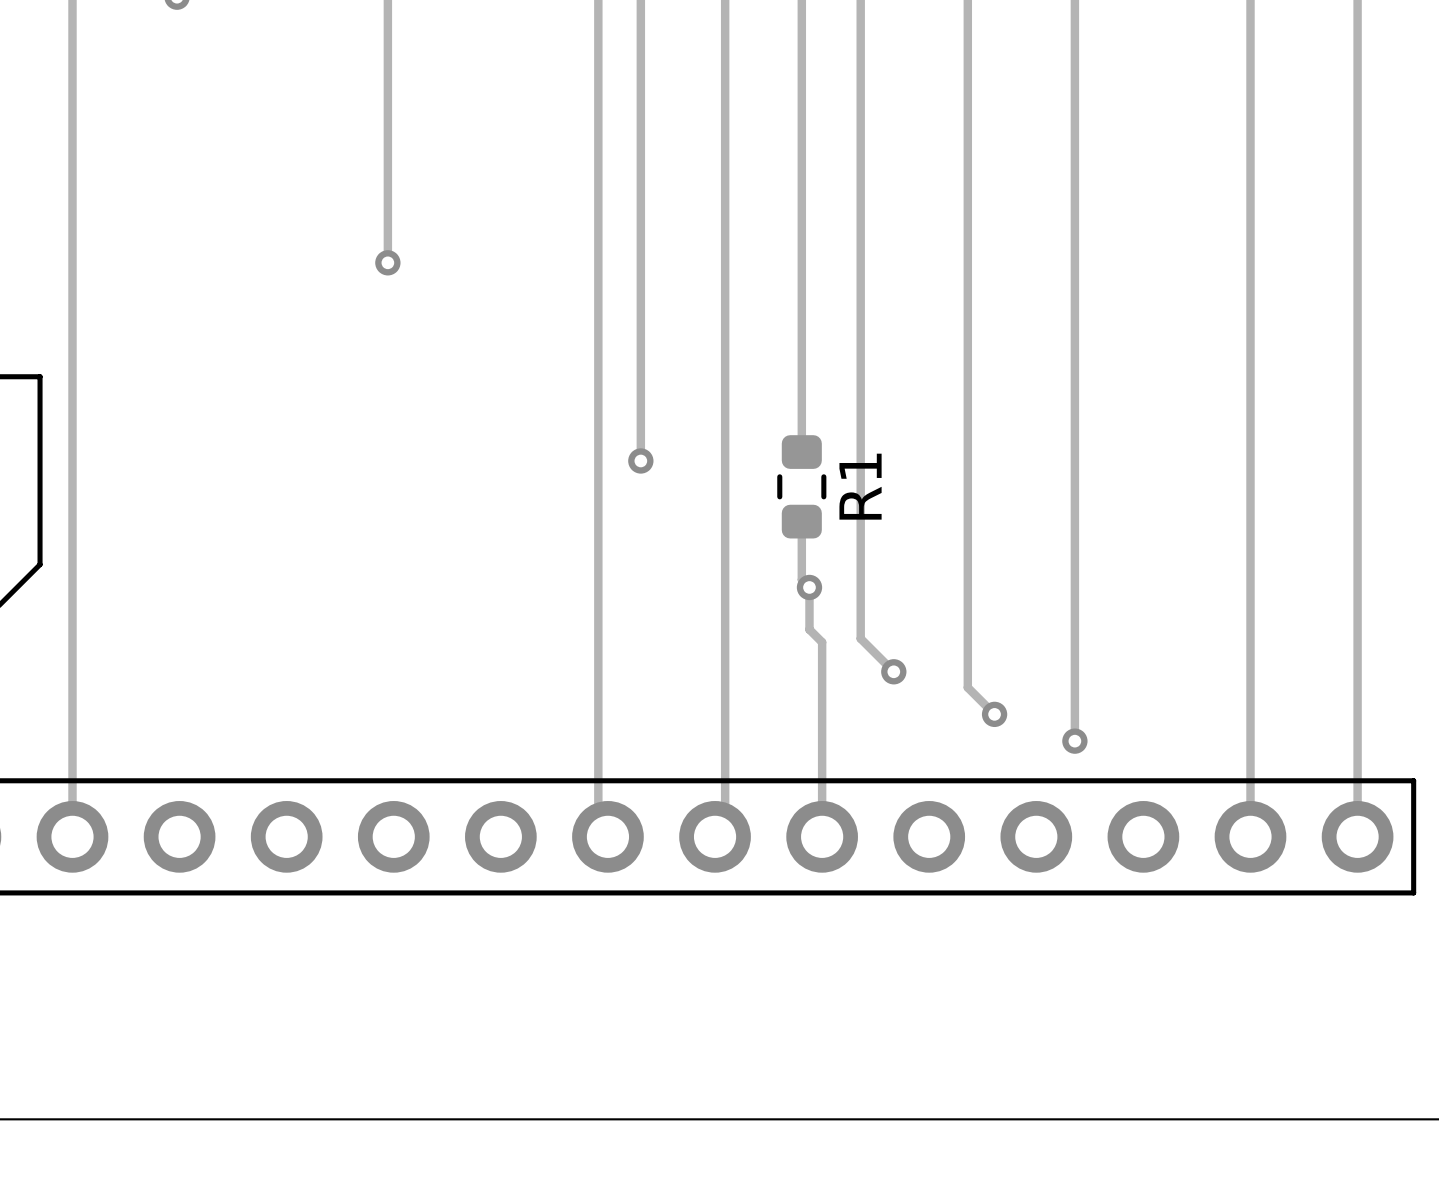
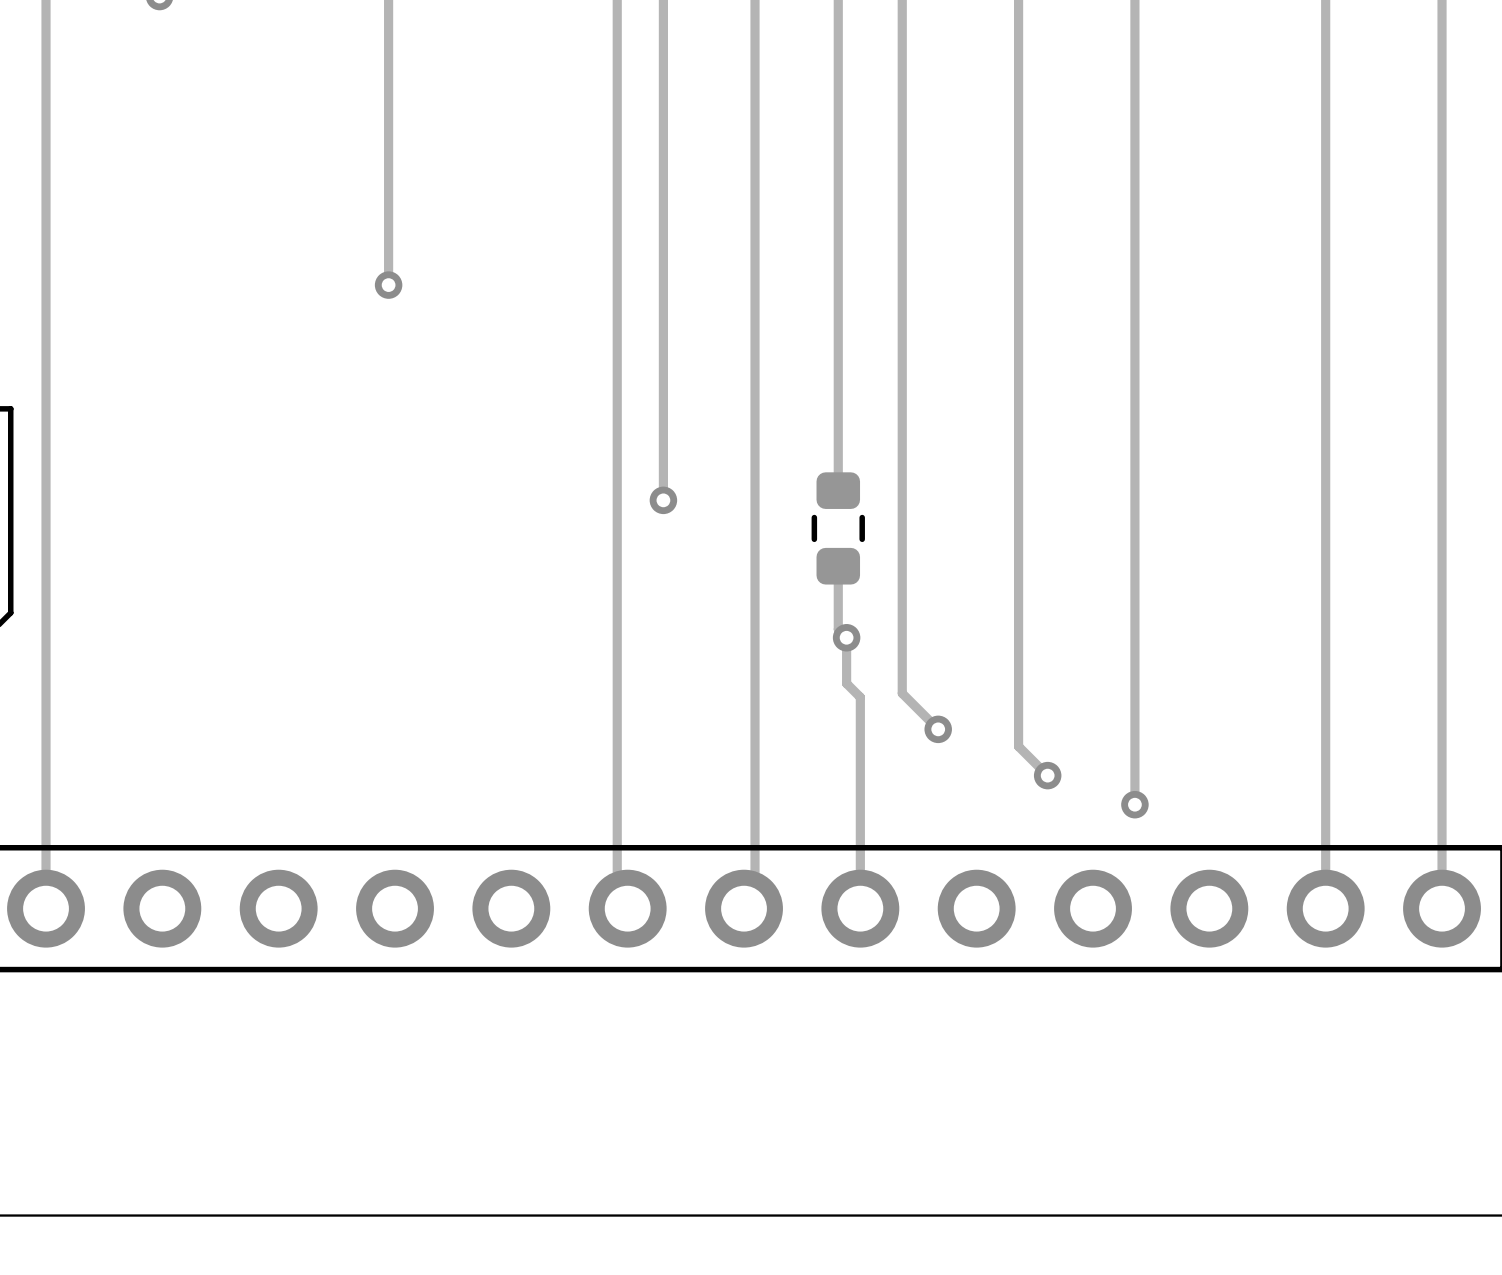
R1 name: R1 (860, 486) -> none

